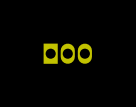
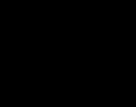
part: (67, 53) -> none

